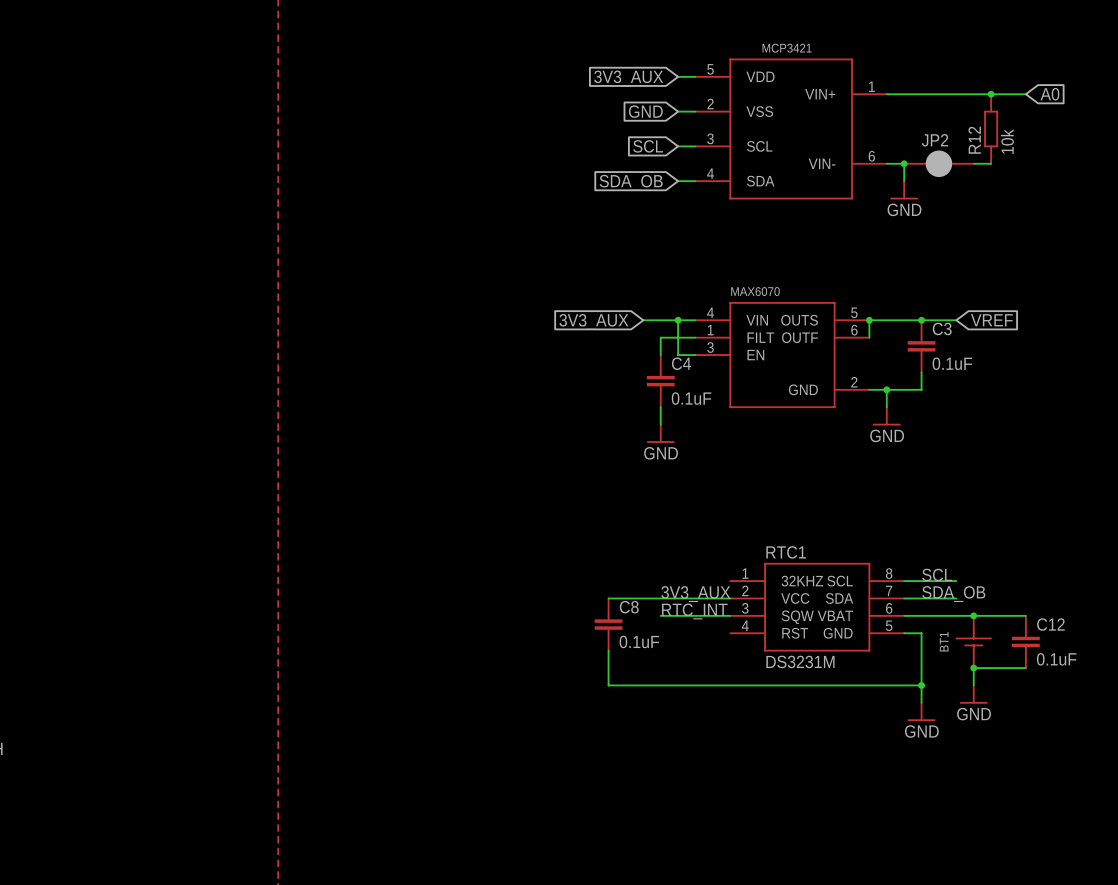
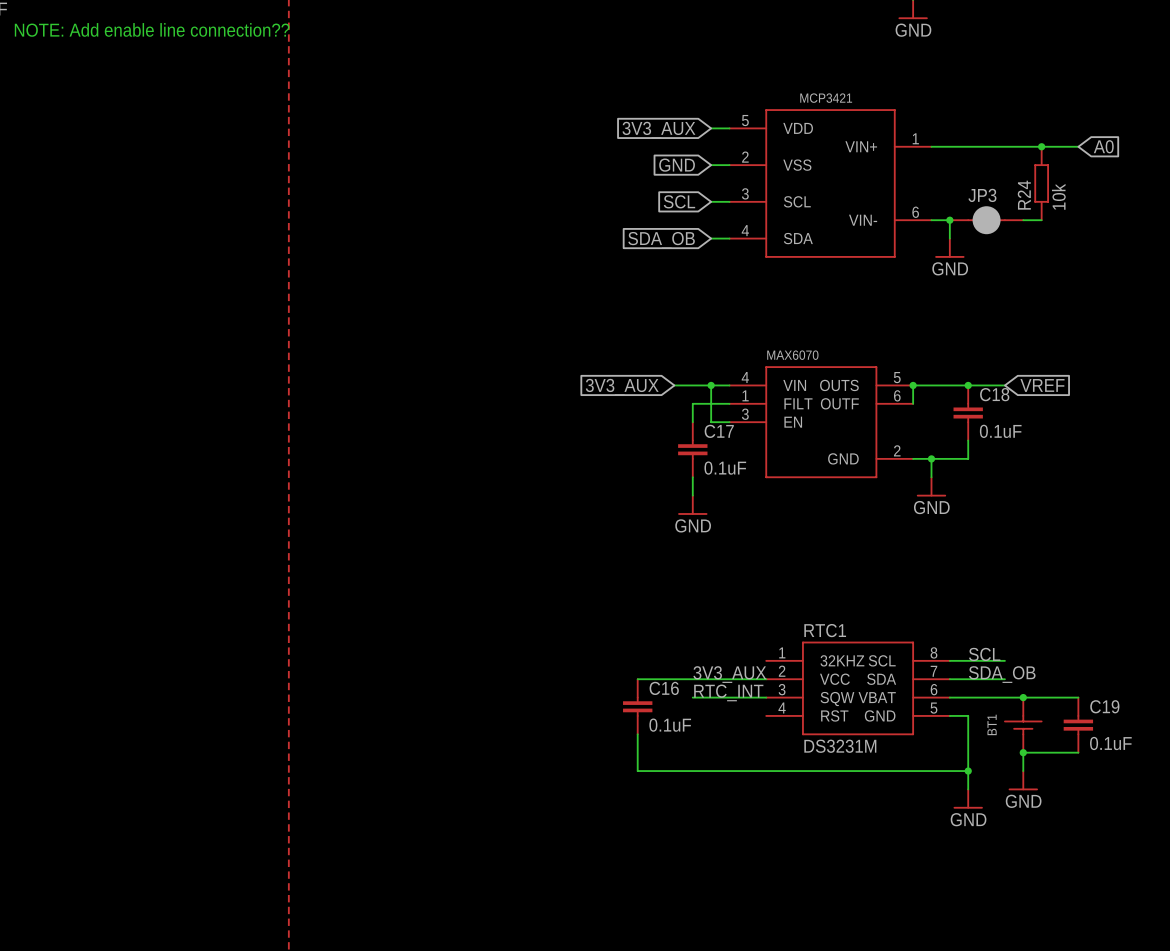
JP2 name: JP2 (935, 140) -> JP3 (982, 195)
R12 name: R12 (974, 140) -> R24 (1024, 195)
C3 name: C3 (942, 328) -> C18 (994, 394)
C4 name: C4 (681, 363) -> C17 (719, 431)
C8 name: C8 (629, 607) -> C16 (664, 688)
C12 name: C12 (1050, 624) -> C19 (1104, 706)

